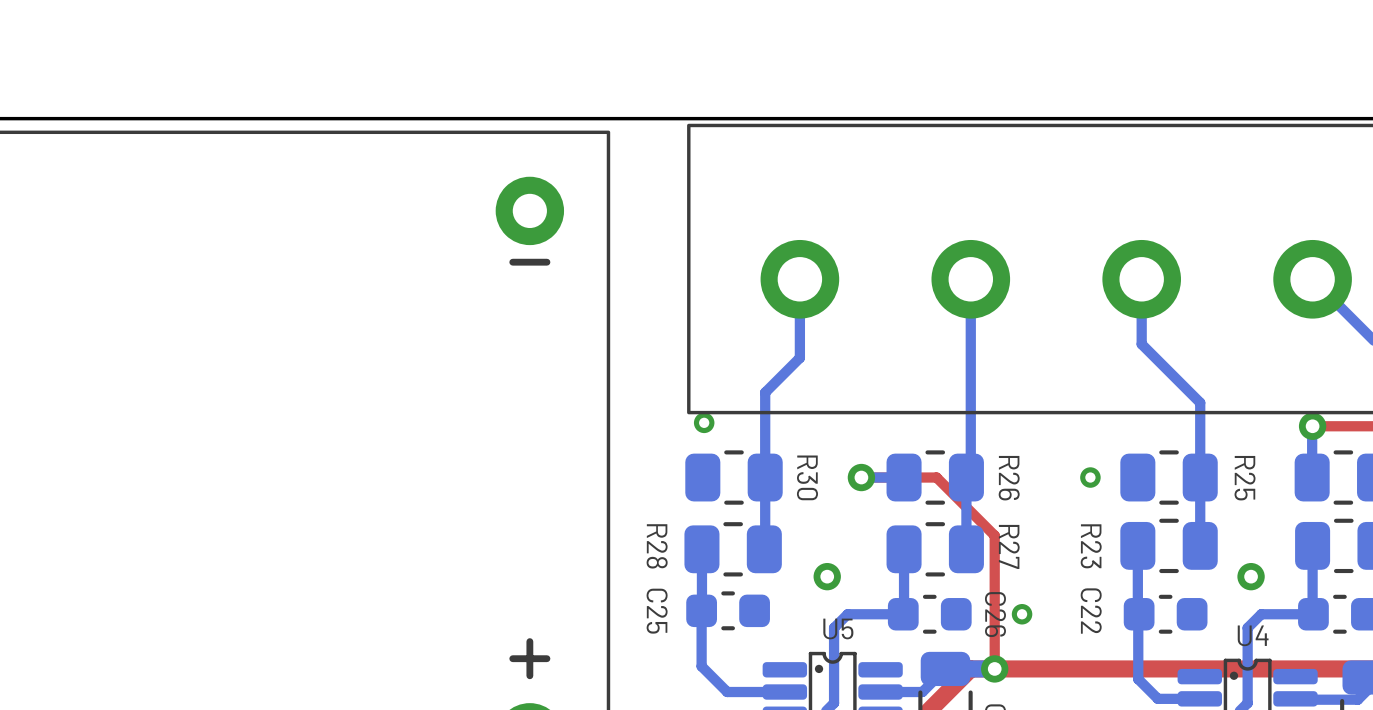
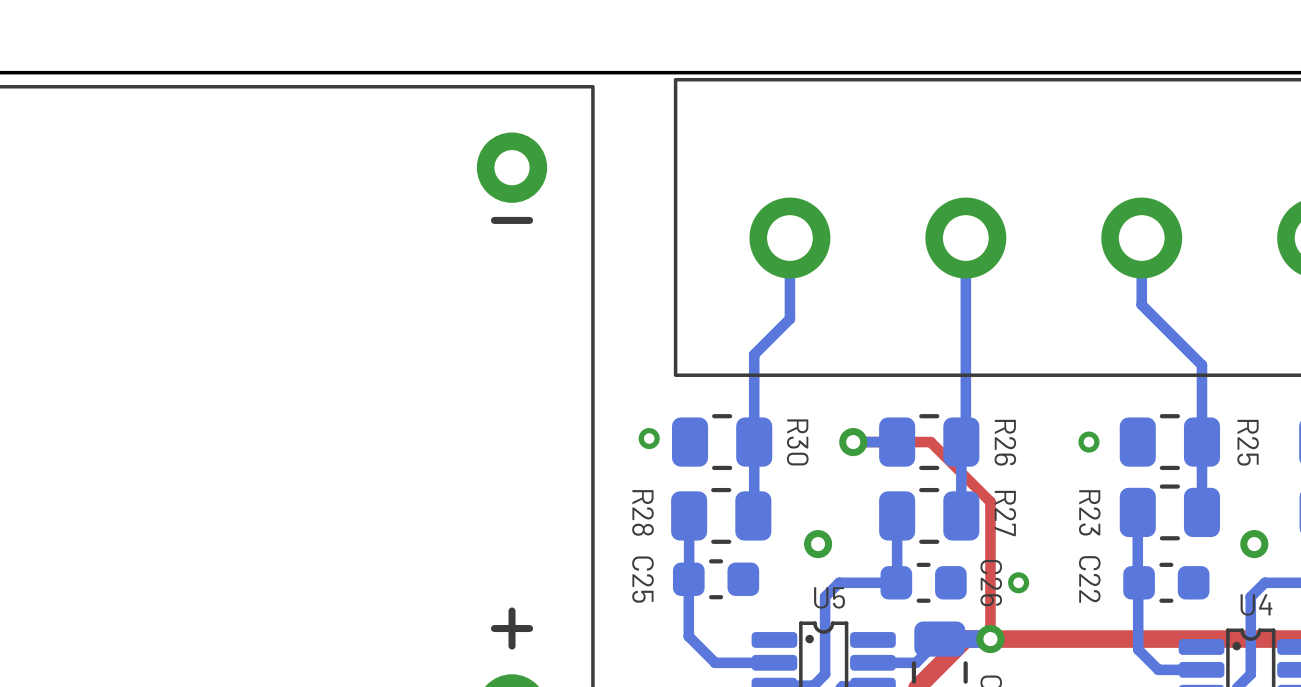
via position: (704, 422) -> (649, 438)

